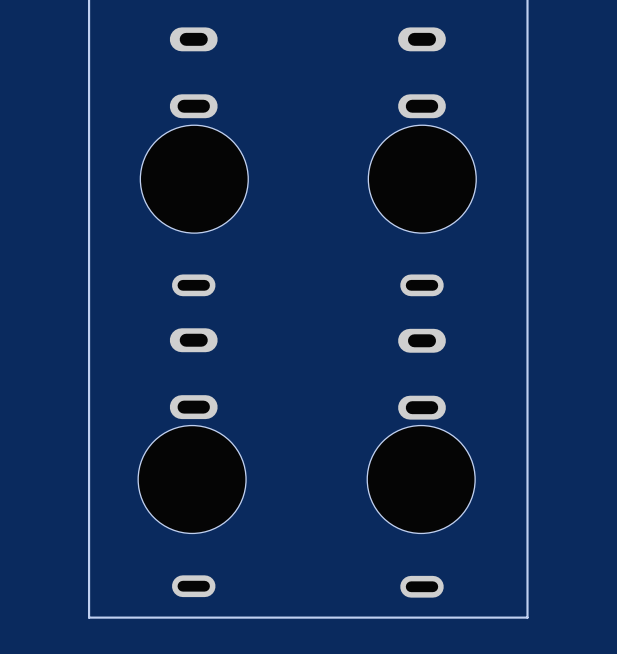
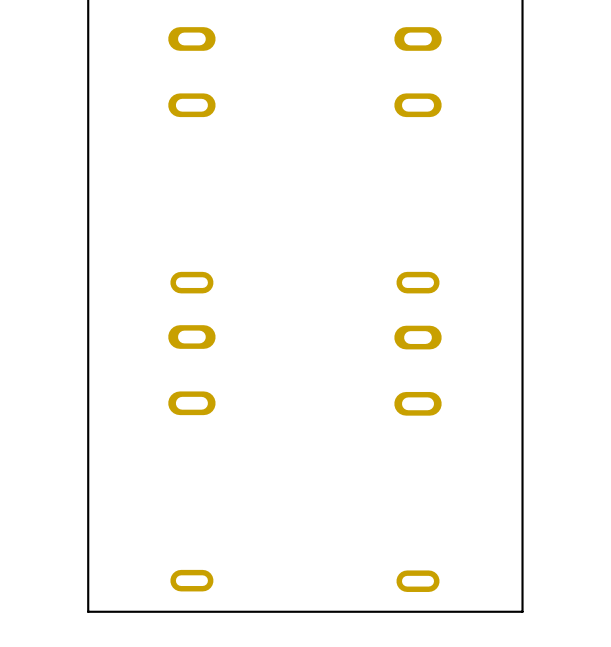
part: (194, 179) -> none
part: (422, 179) -> none
part: (192, 479) -> none
part: (421, 479) -> none

